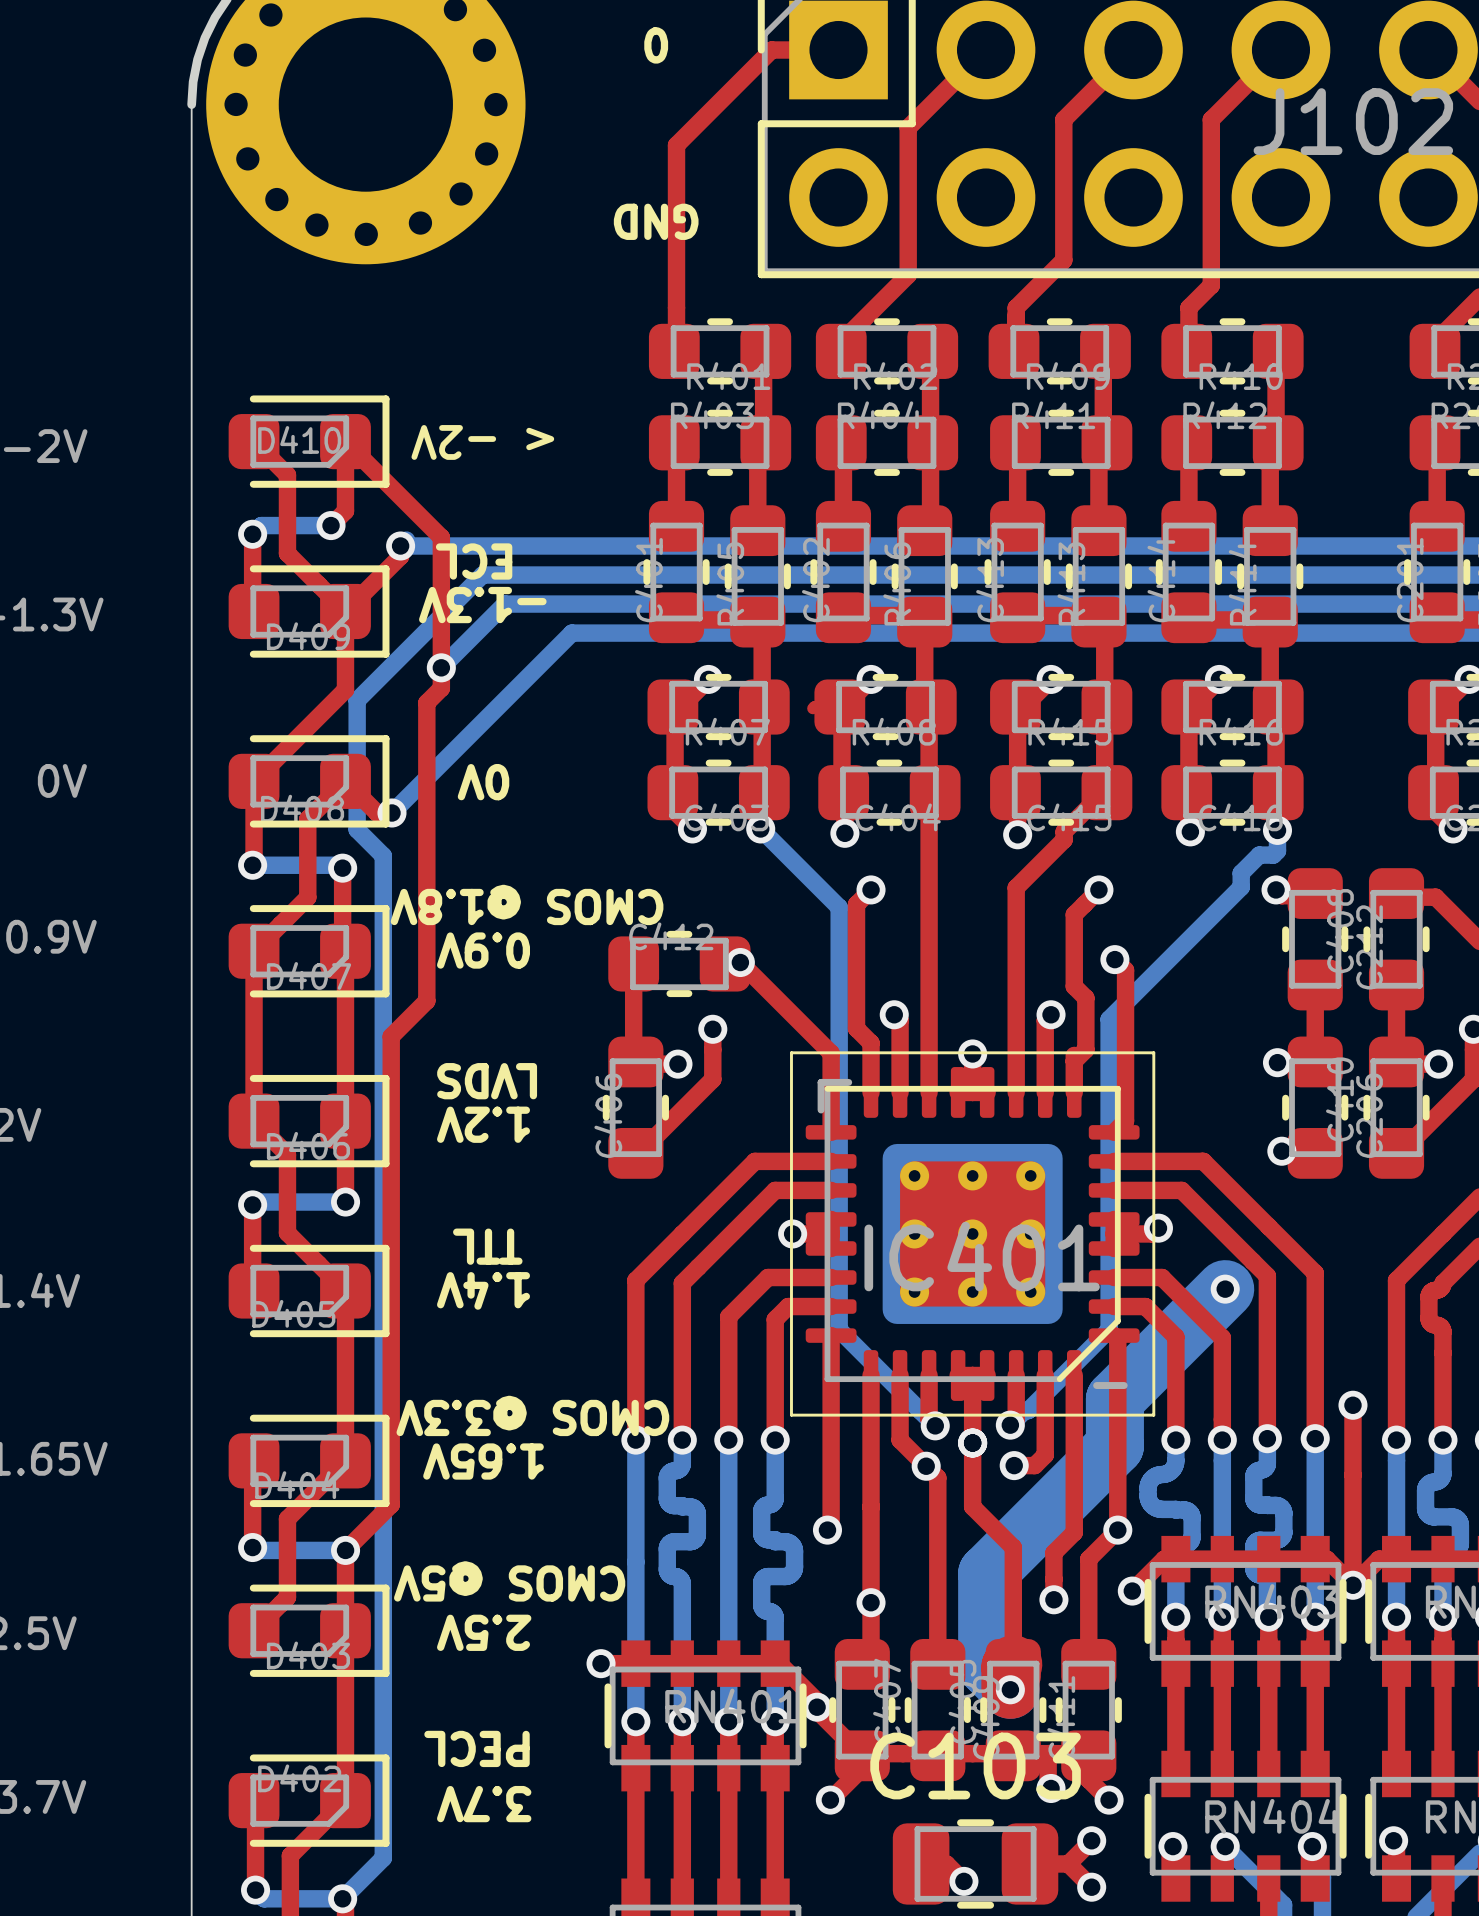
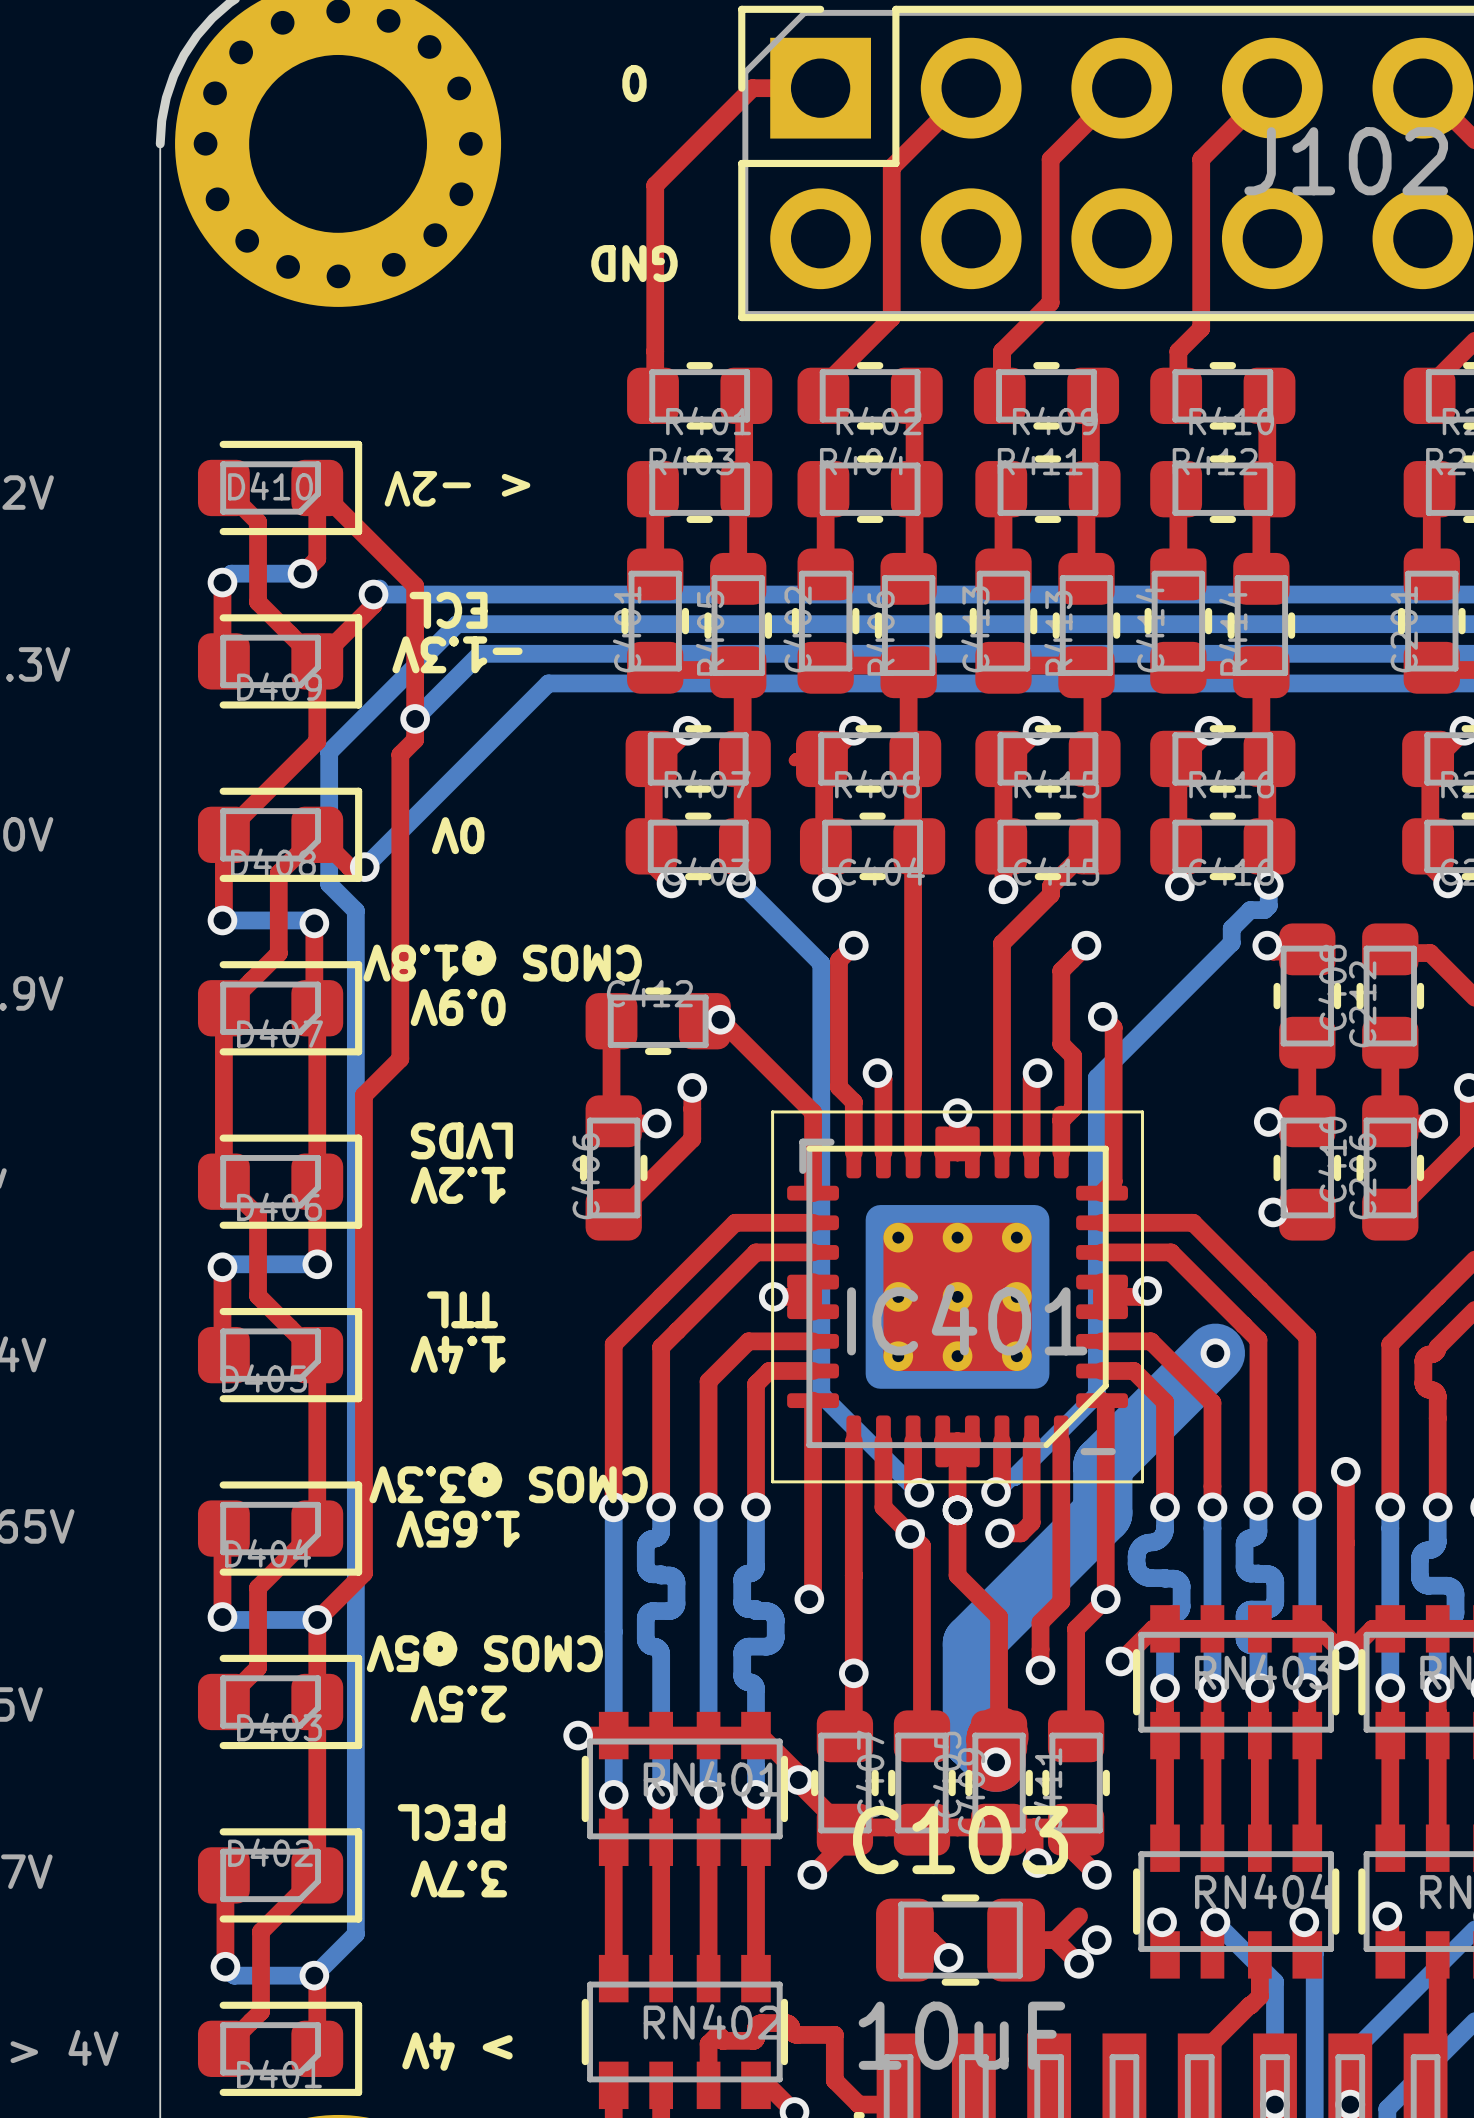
via position: (1091, 1840) -> (1096, 1940)

